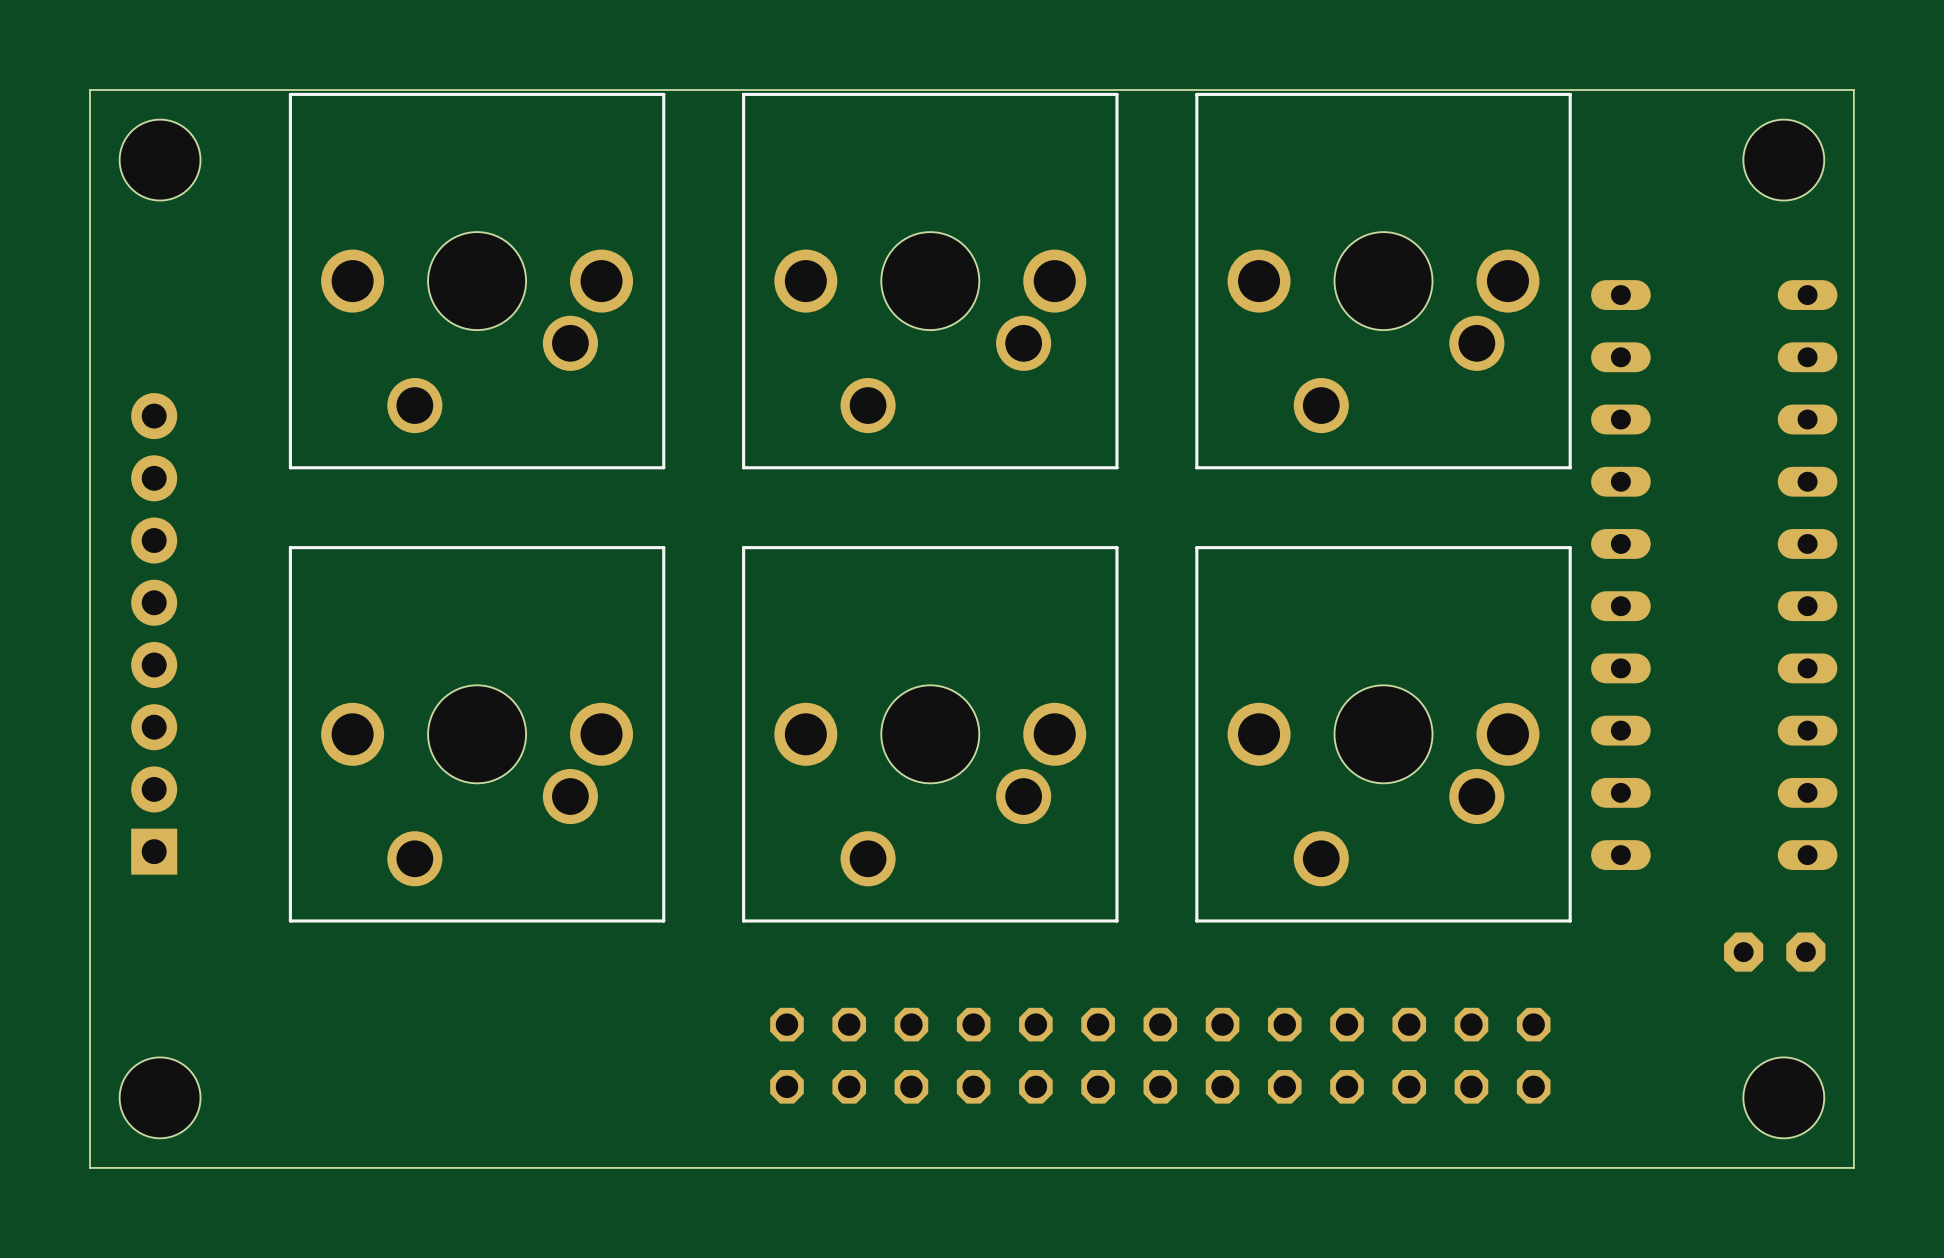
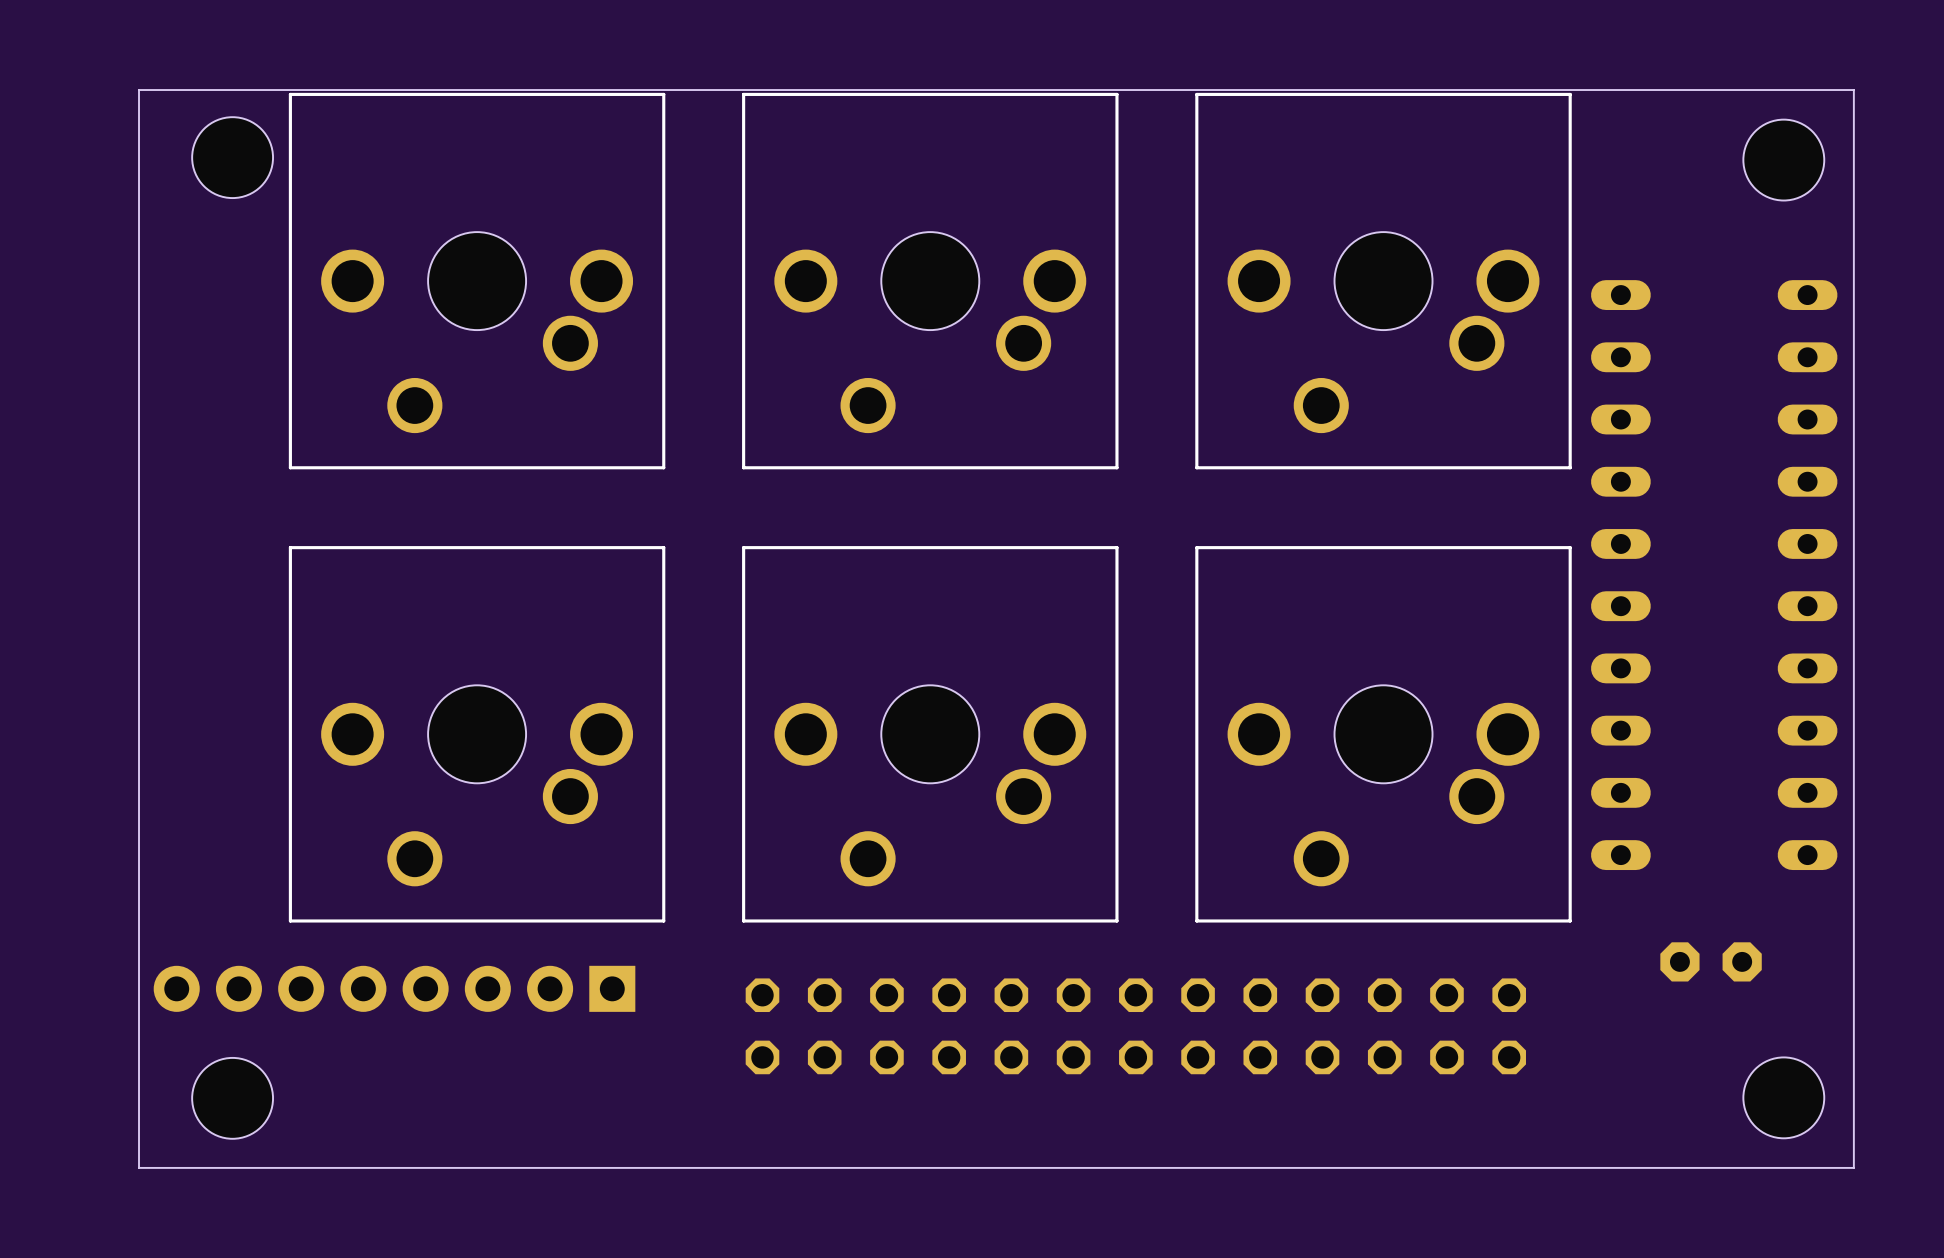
board edge: (139, 90) (90, 90) (90, 1167) (139, 1167) -> (139, 90) (139, 1167)
part position: (160, 160) -> (232, 157)
part rotation: 0° (154, 633) -> 90° counterclockwise (394, 988)
part position: (154, 633) -> (394, 988)
part position: (1774, 952) -> (1711, 961)
part position: (1160, 1055) -> (1135, 1026)
part position: (160, 1097) -> (232, 1098)

